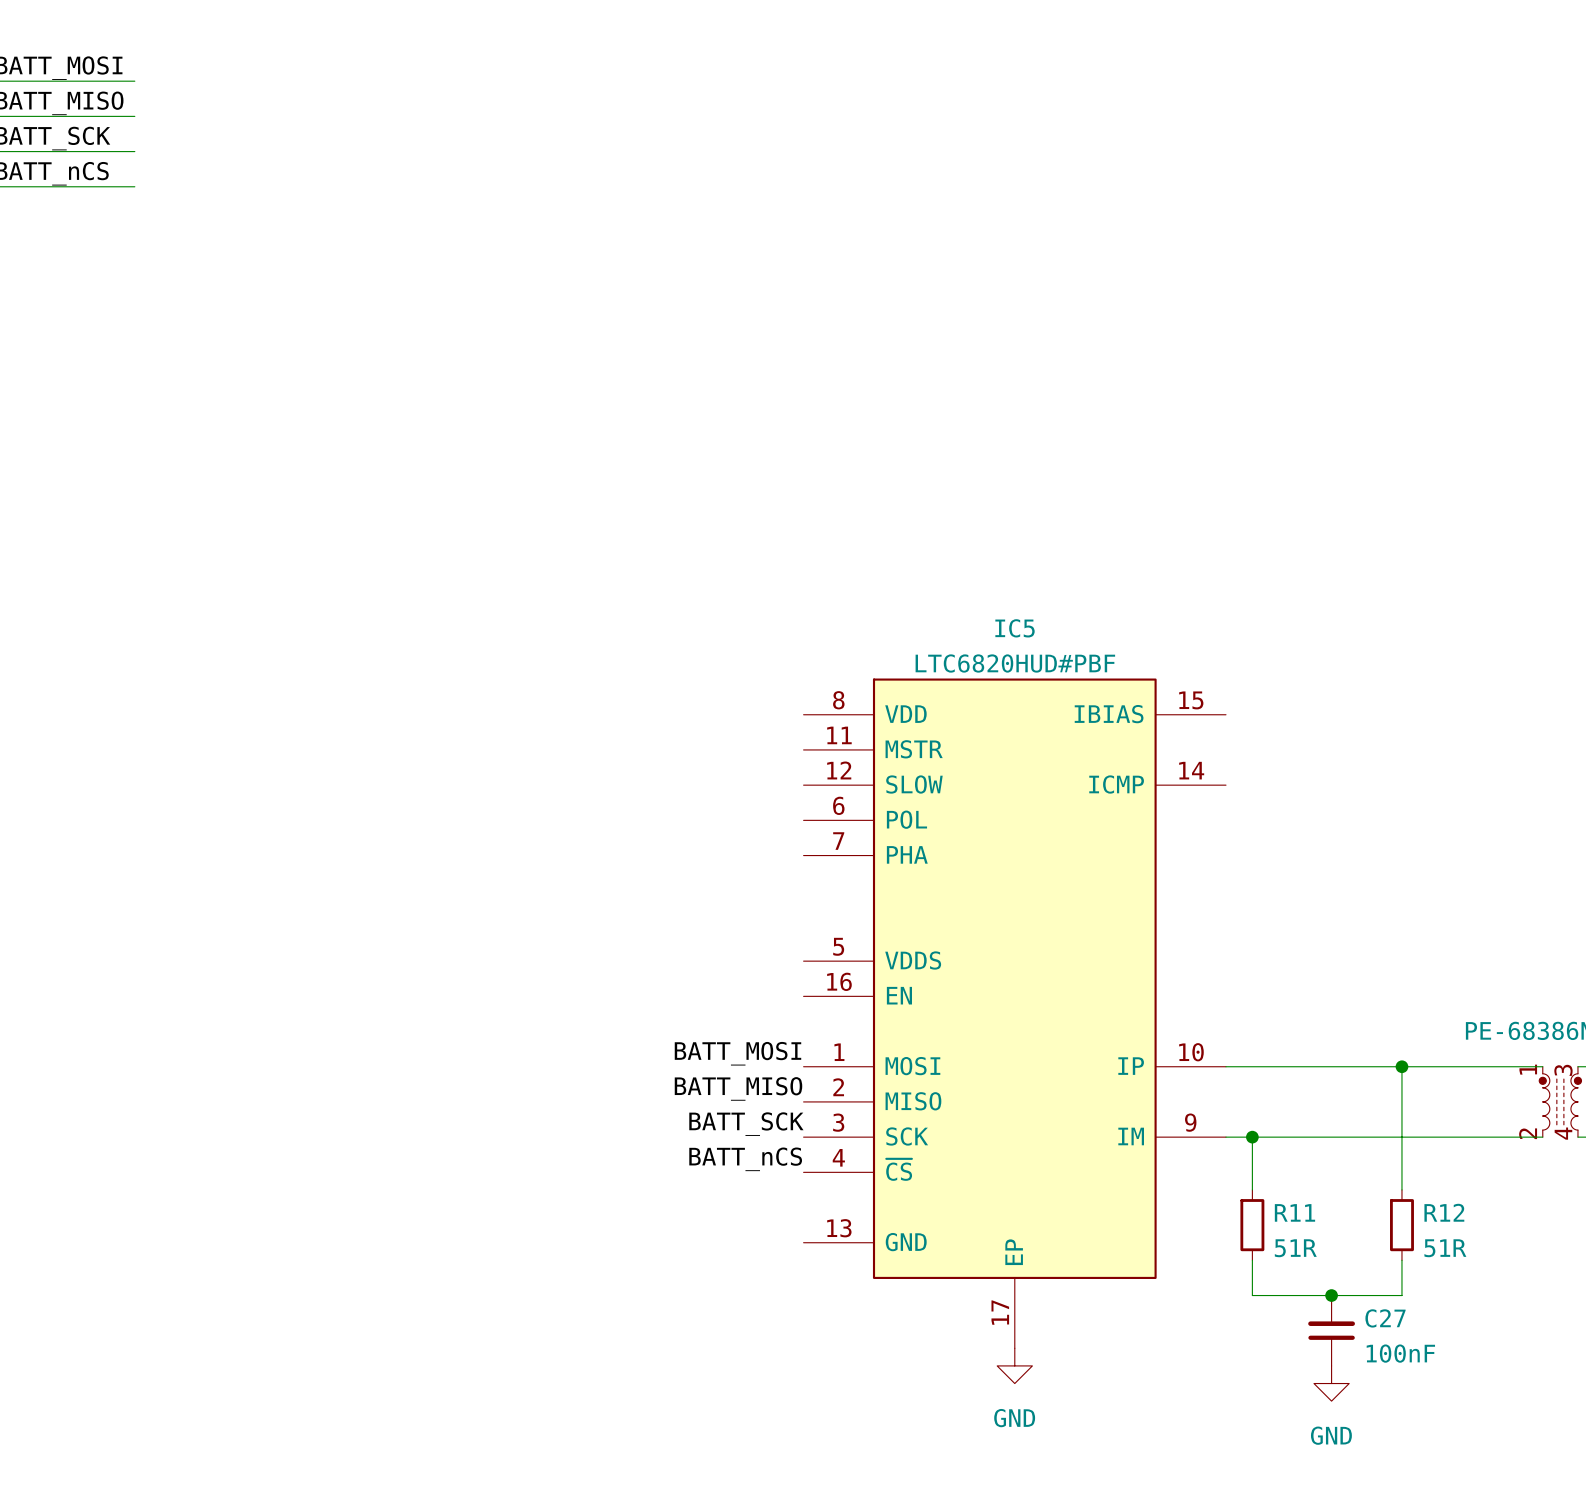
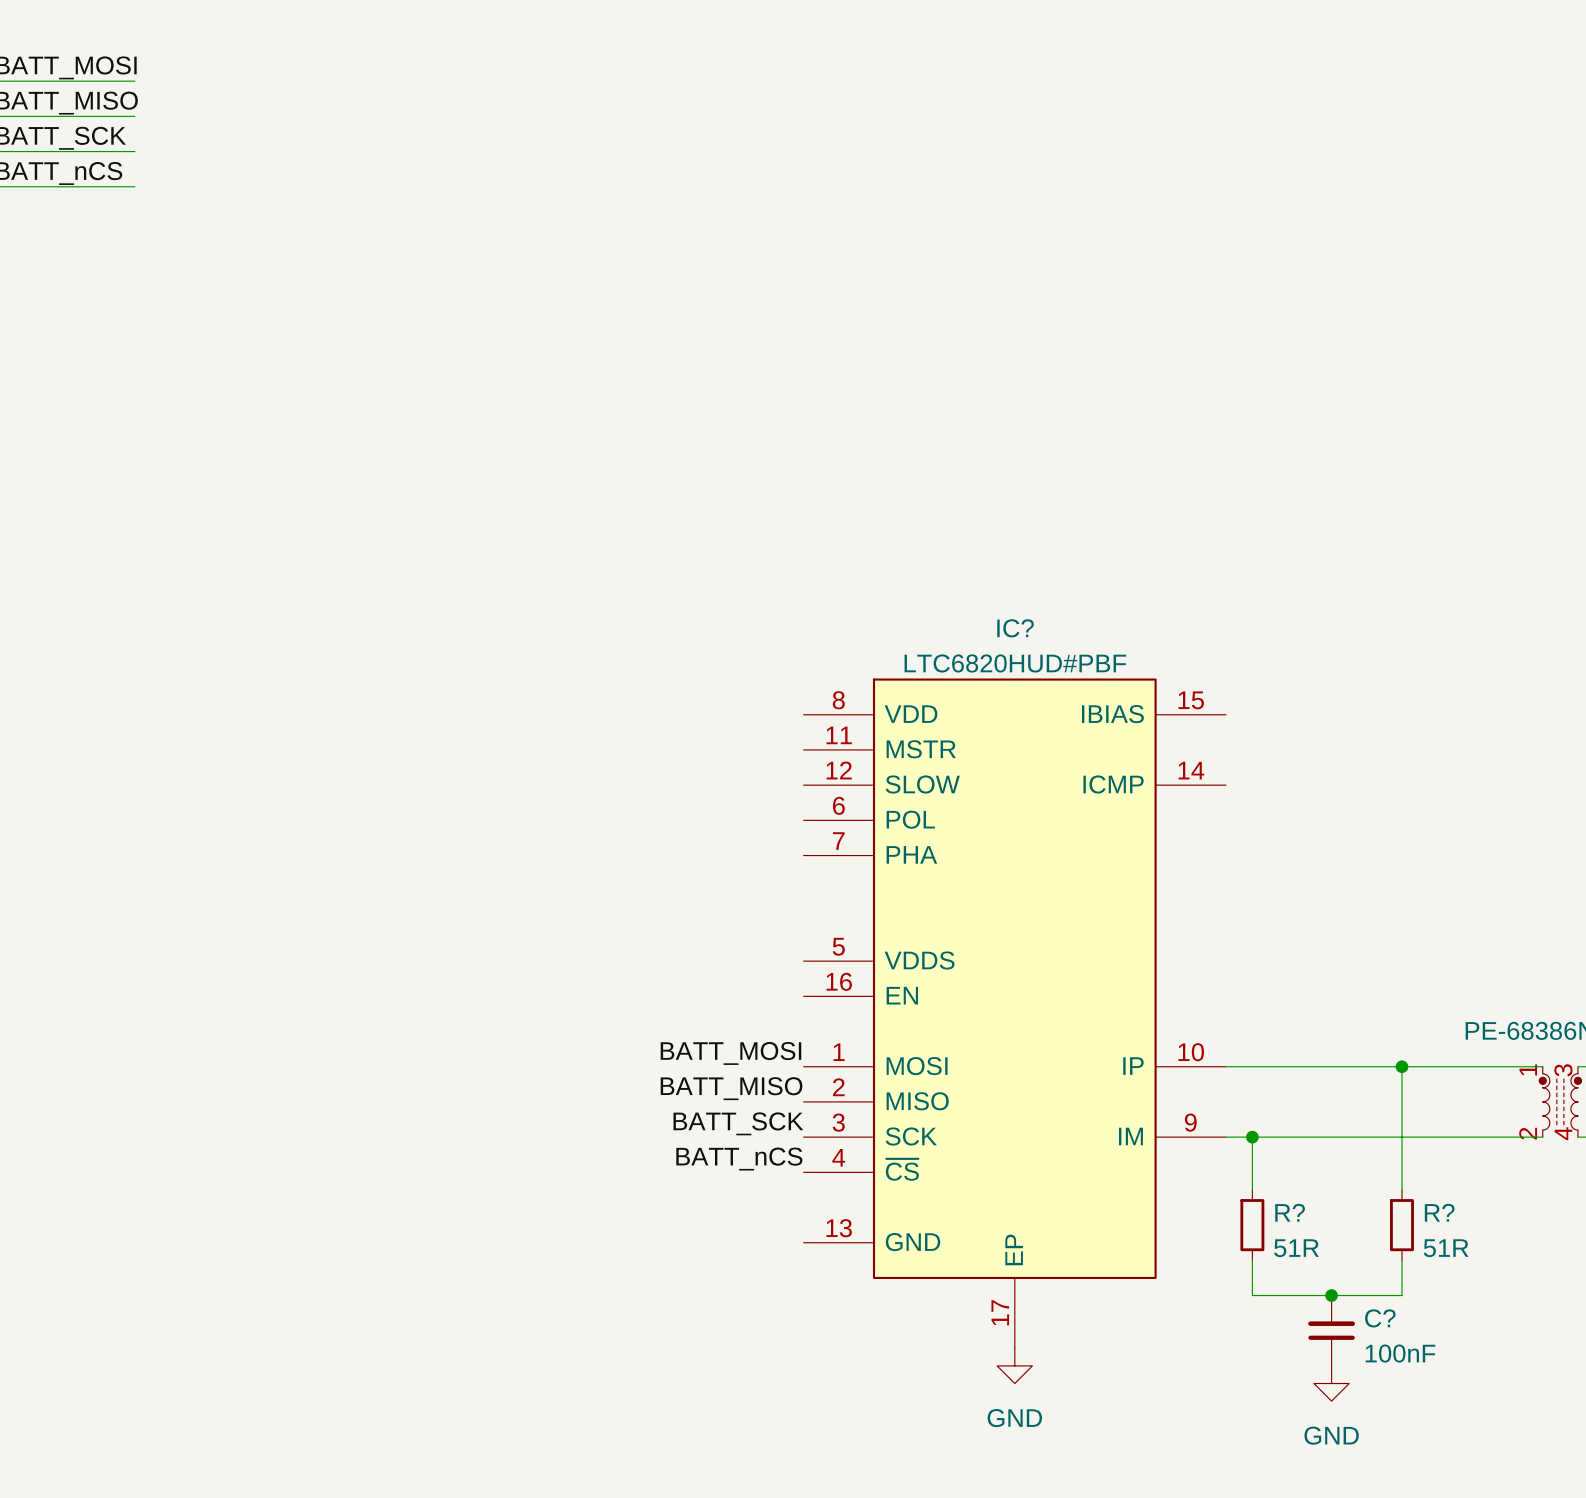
IC5 name: IC5 (1015, 628) -> IC? (1015, 628)
R11 name: R11 (1294, 1212) -> R? (1290, 1212)
R12 name: R12 (1444, 1212) -> R? (1439, 1212)
C27 name: C27 (1385, 1318) -> C? (1380, 1318)

